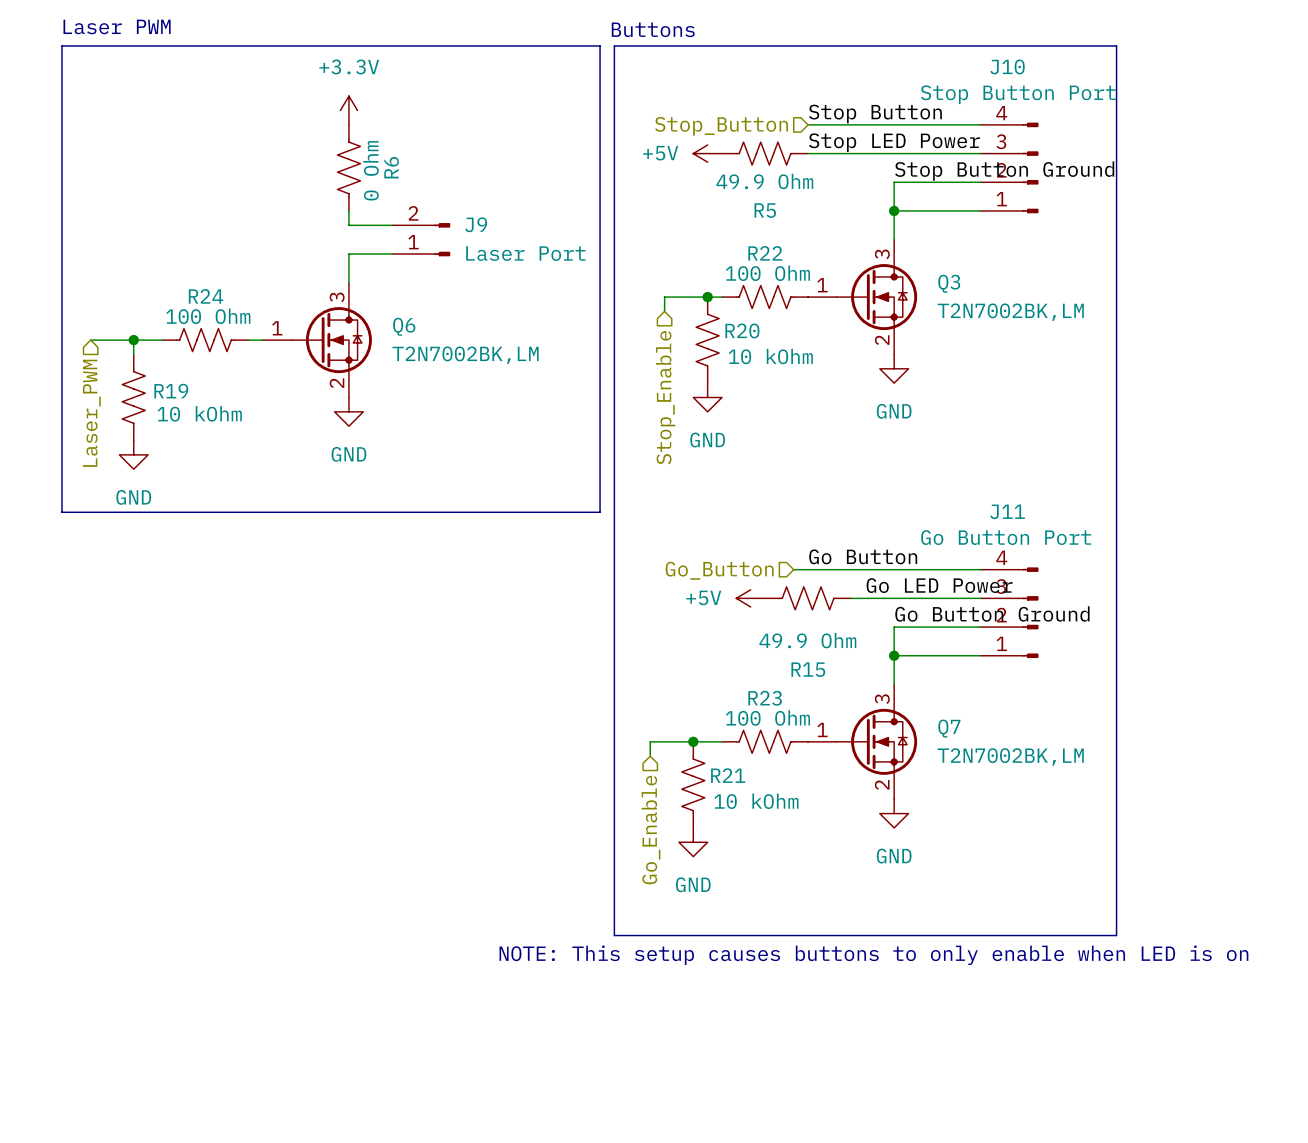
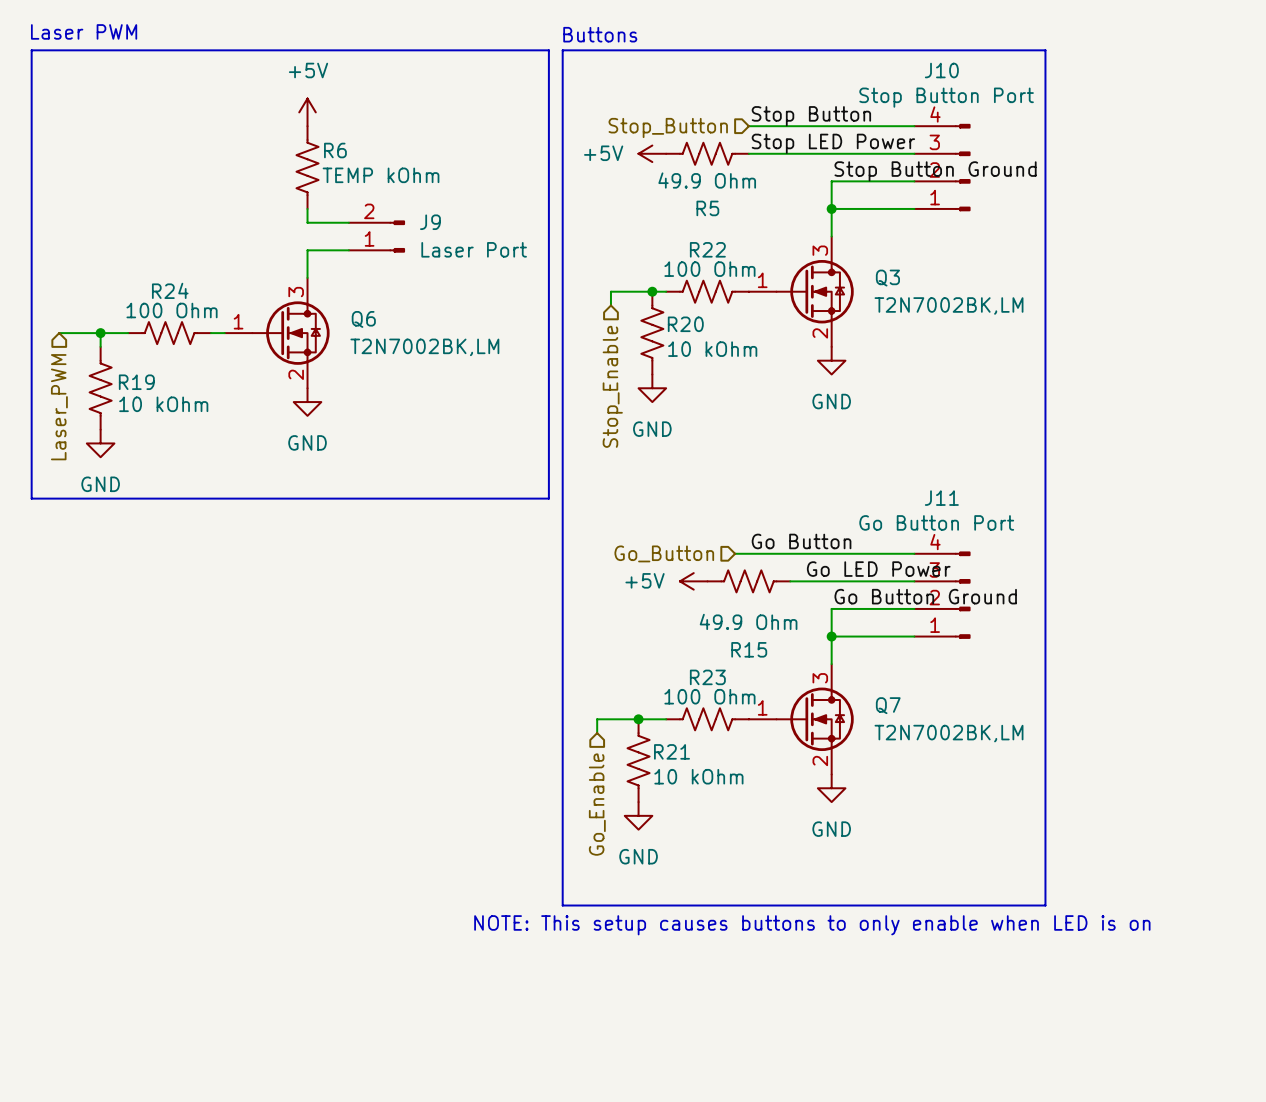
power symbol: +3.3V (348, 110) -> +5V (307, 112)
R6 name rotation: 0° (391, 167) -> 90° clockwise (335, 150)
R6 value: 0 Ohm (371, 170) -> TEMP kOhm (381, 175)

